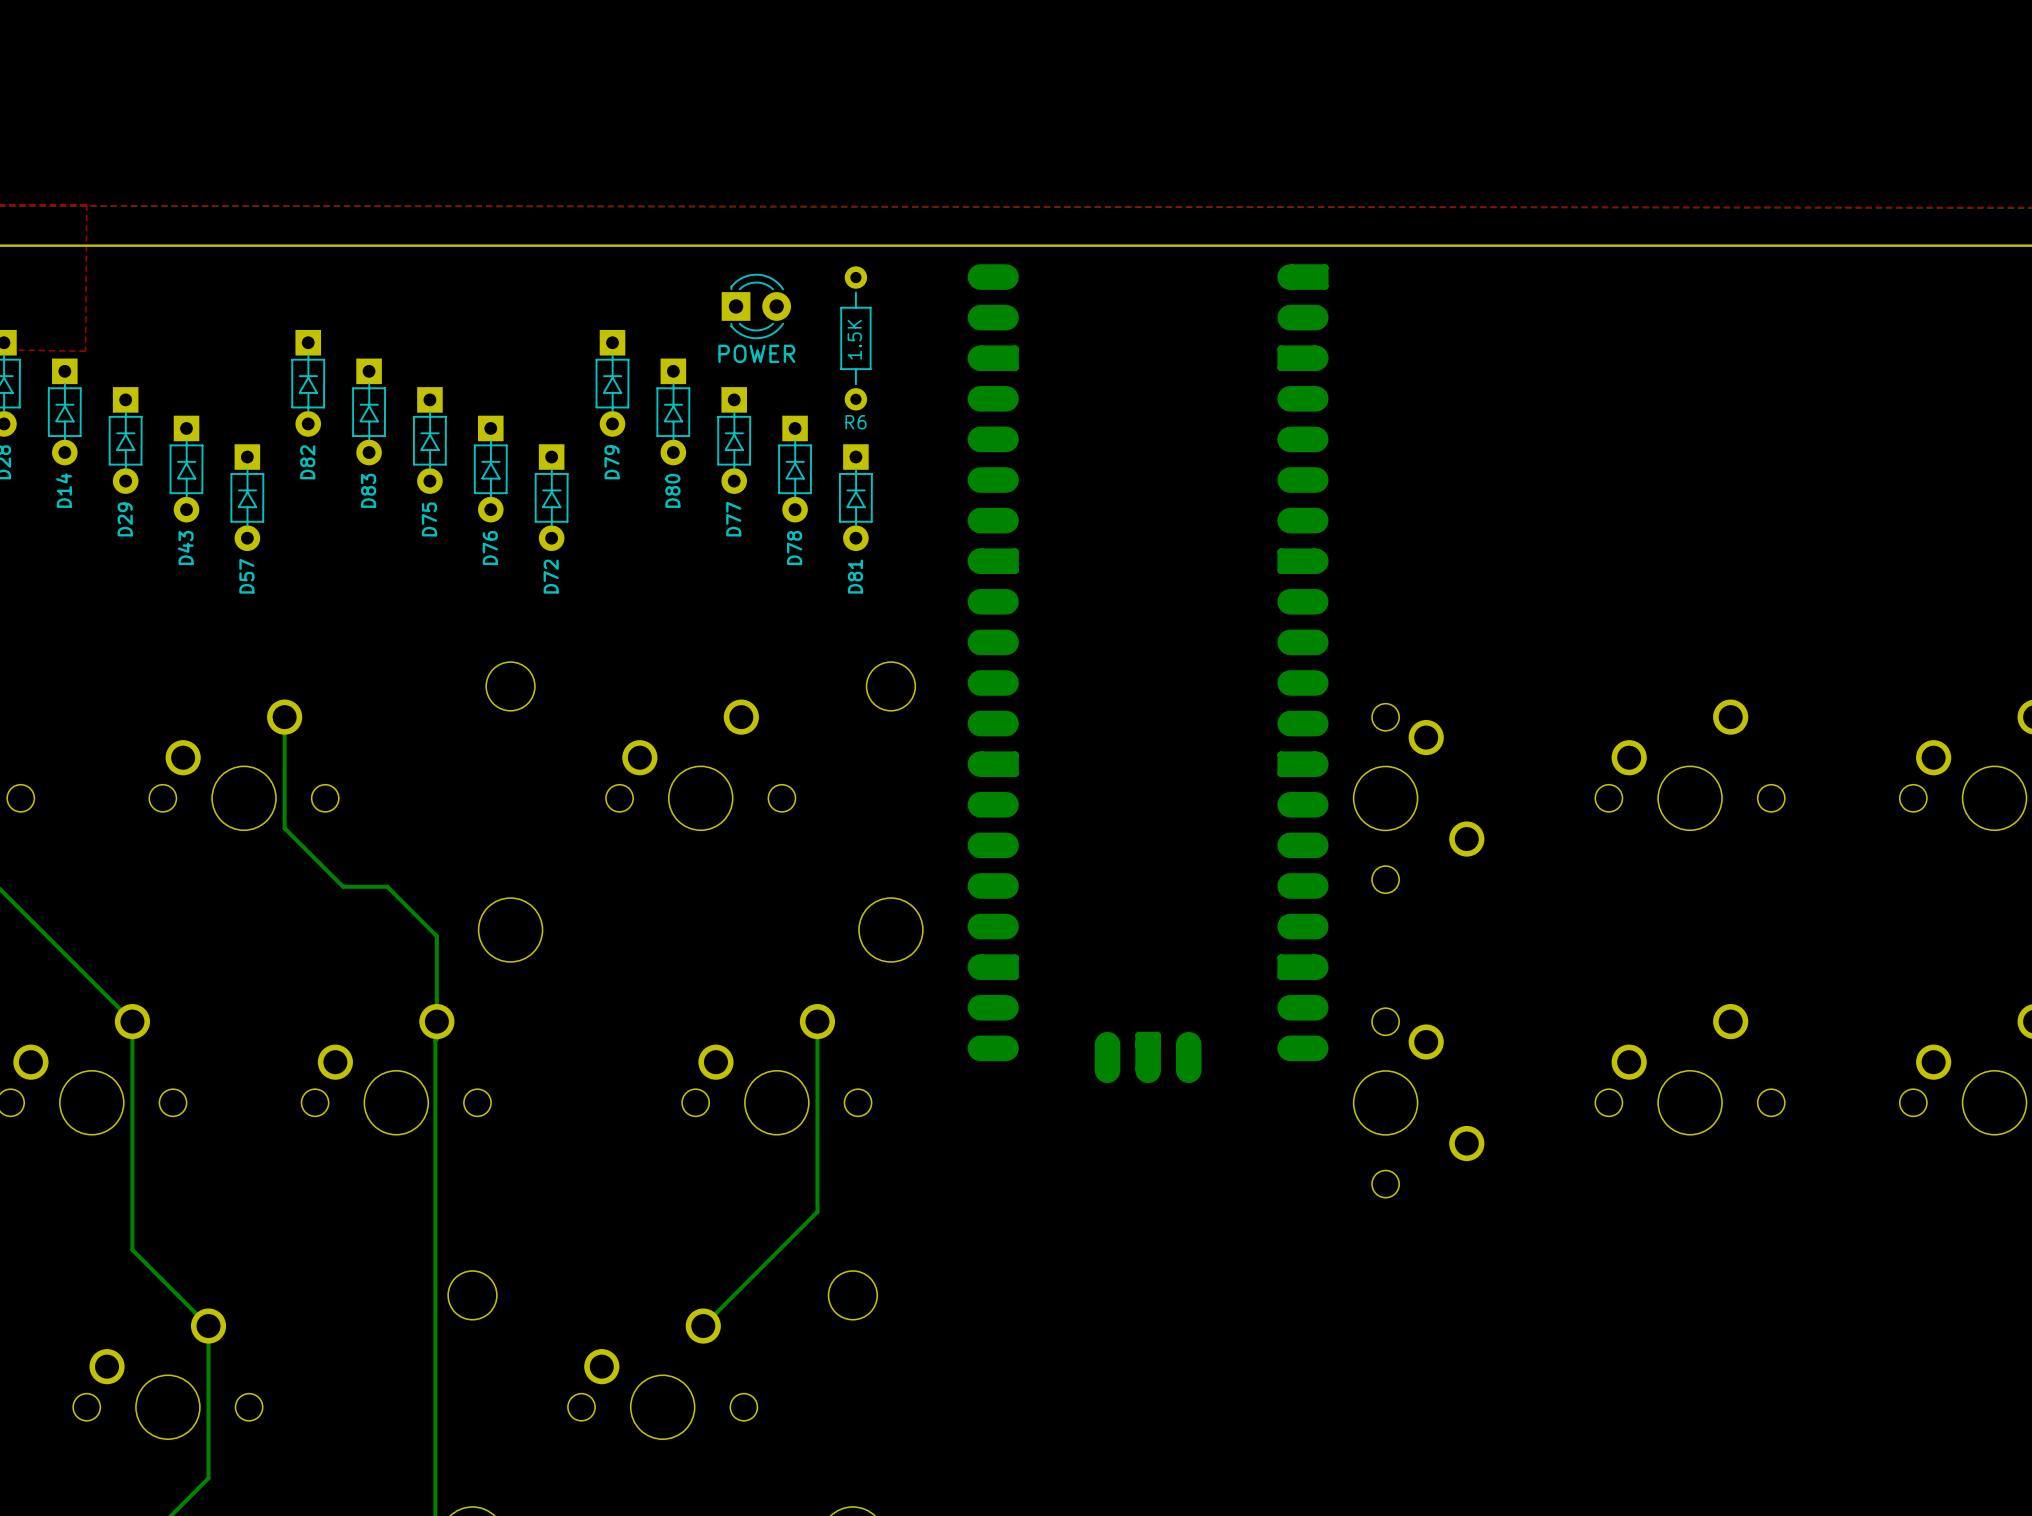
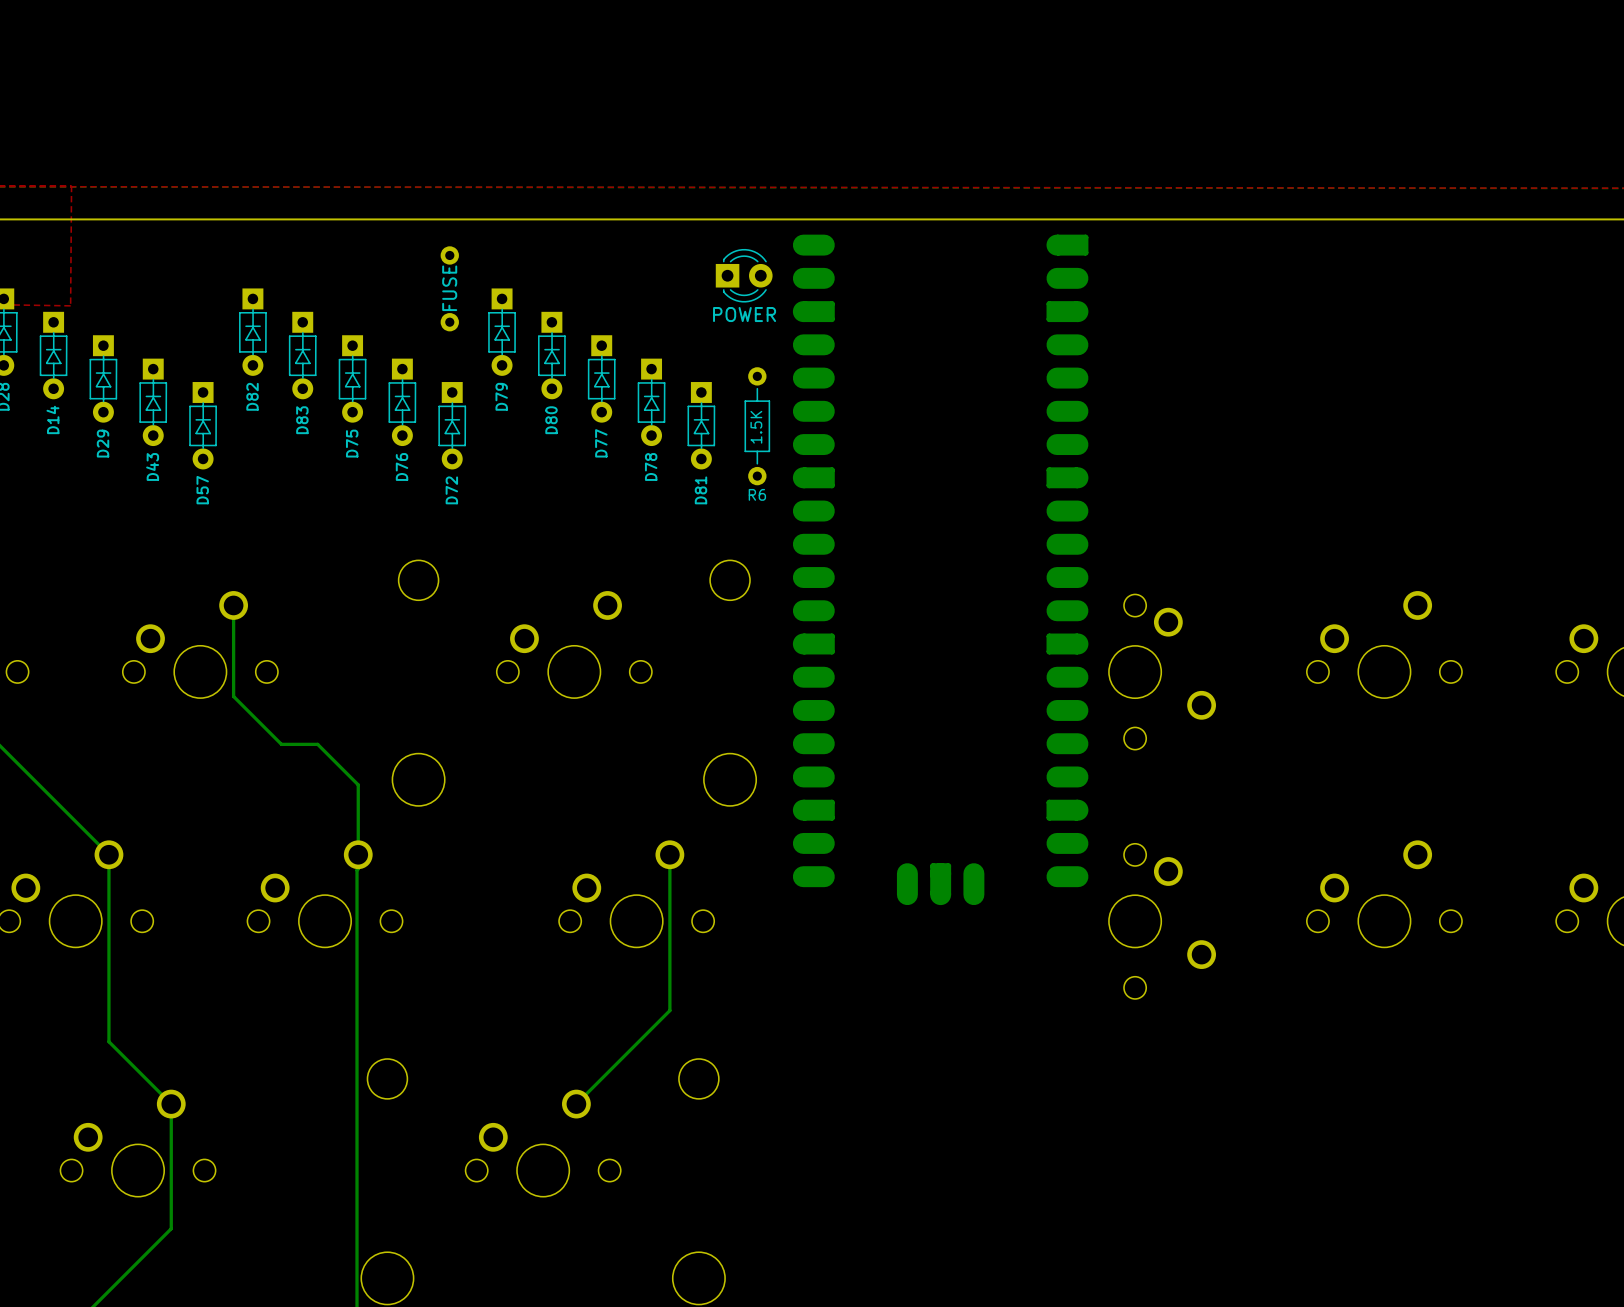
part position: (756, 306) -> (744, 275)
part: none -> (449, 288)
R6 position: (855, 338) -> (757, 426)
text position: POWER (756, 353) -> POWER (744, 314)

